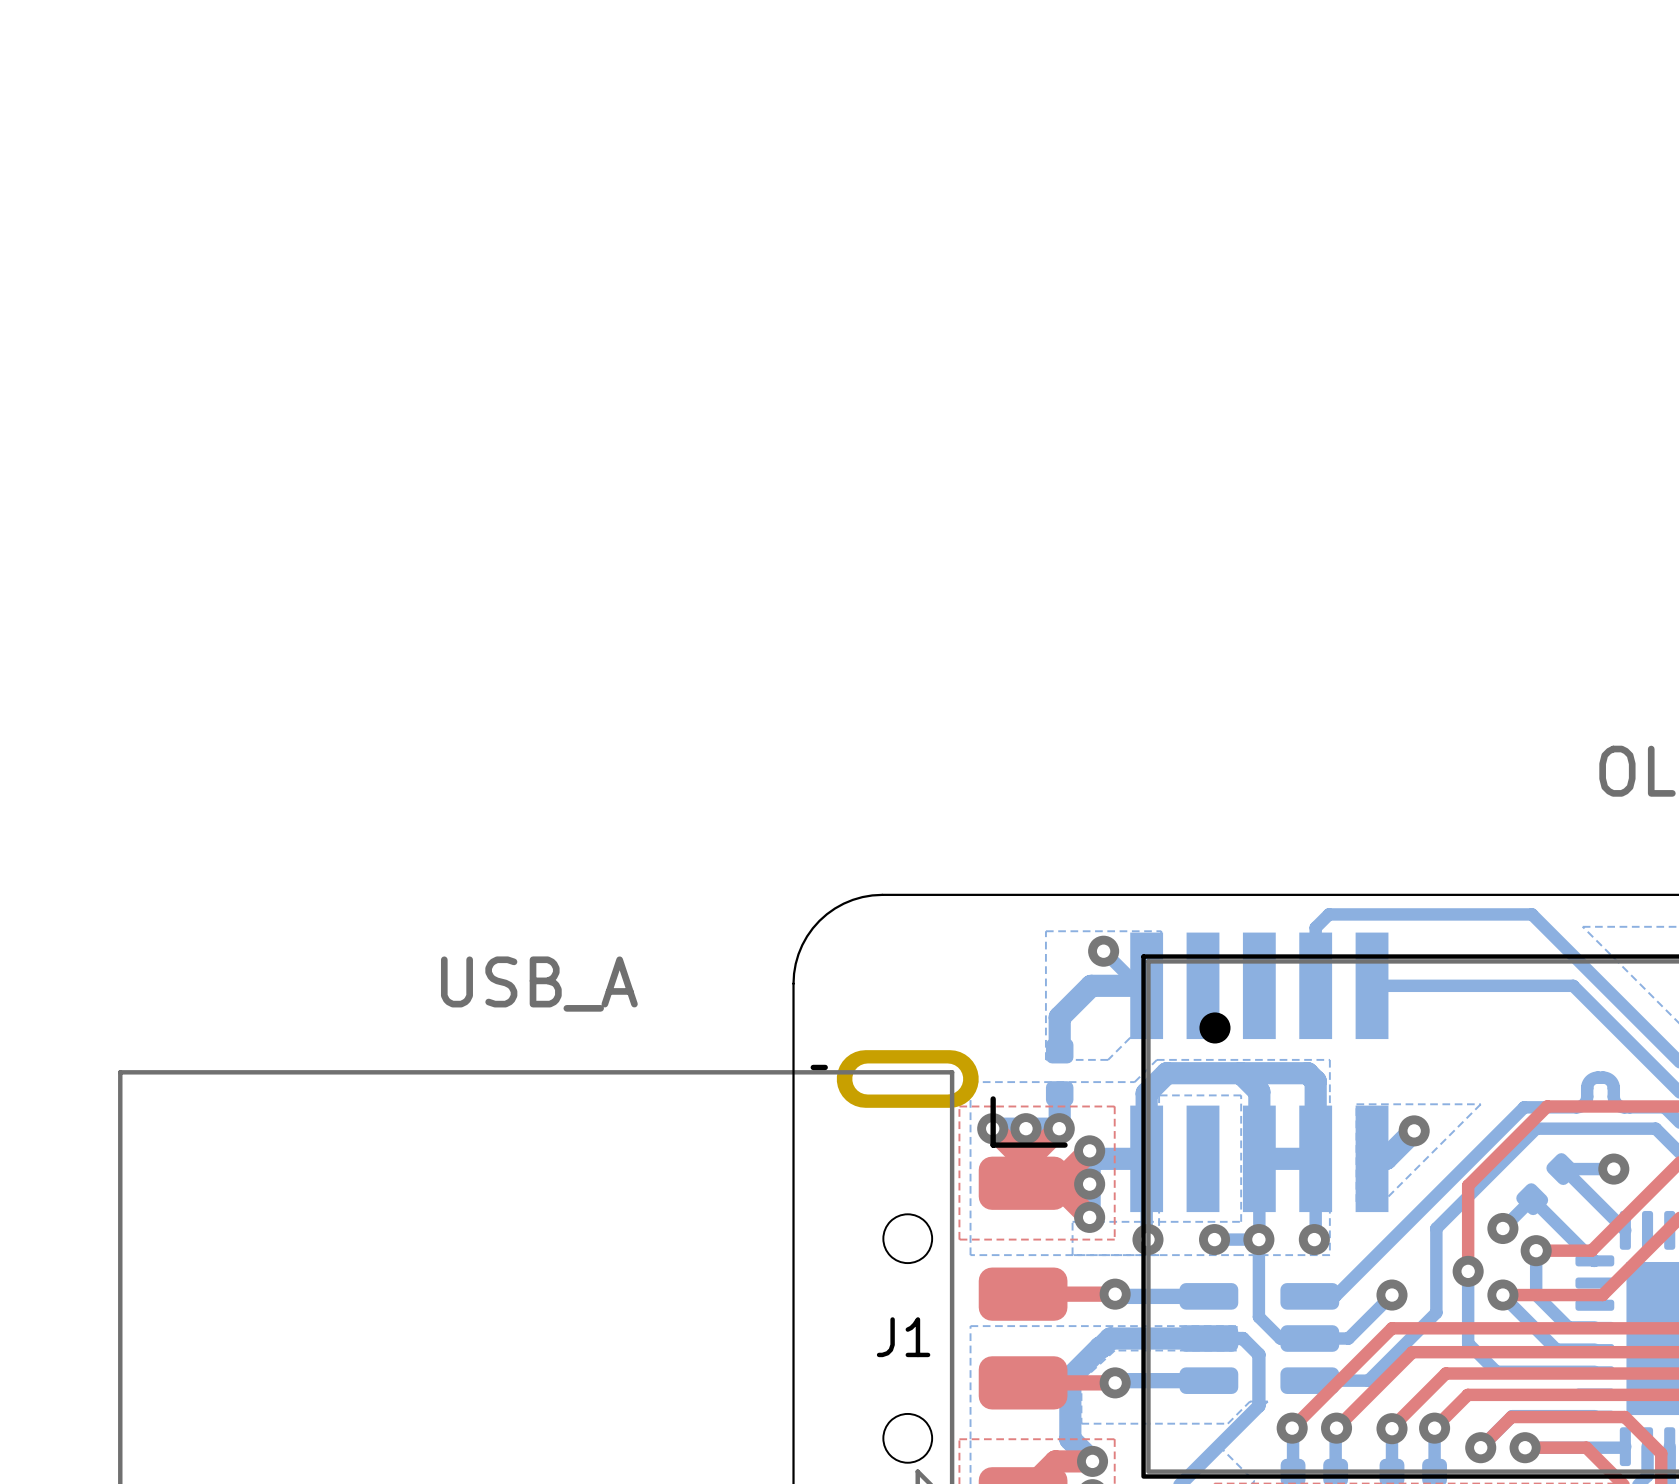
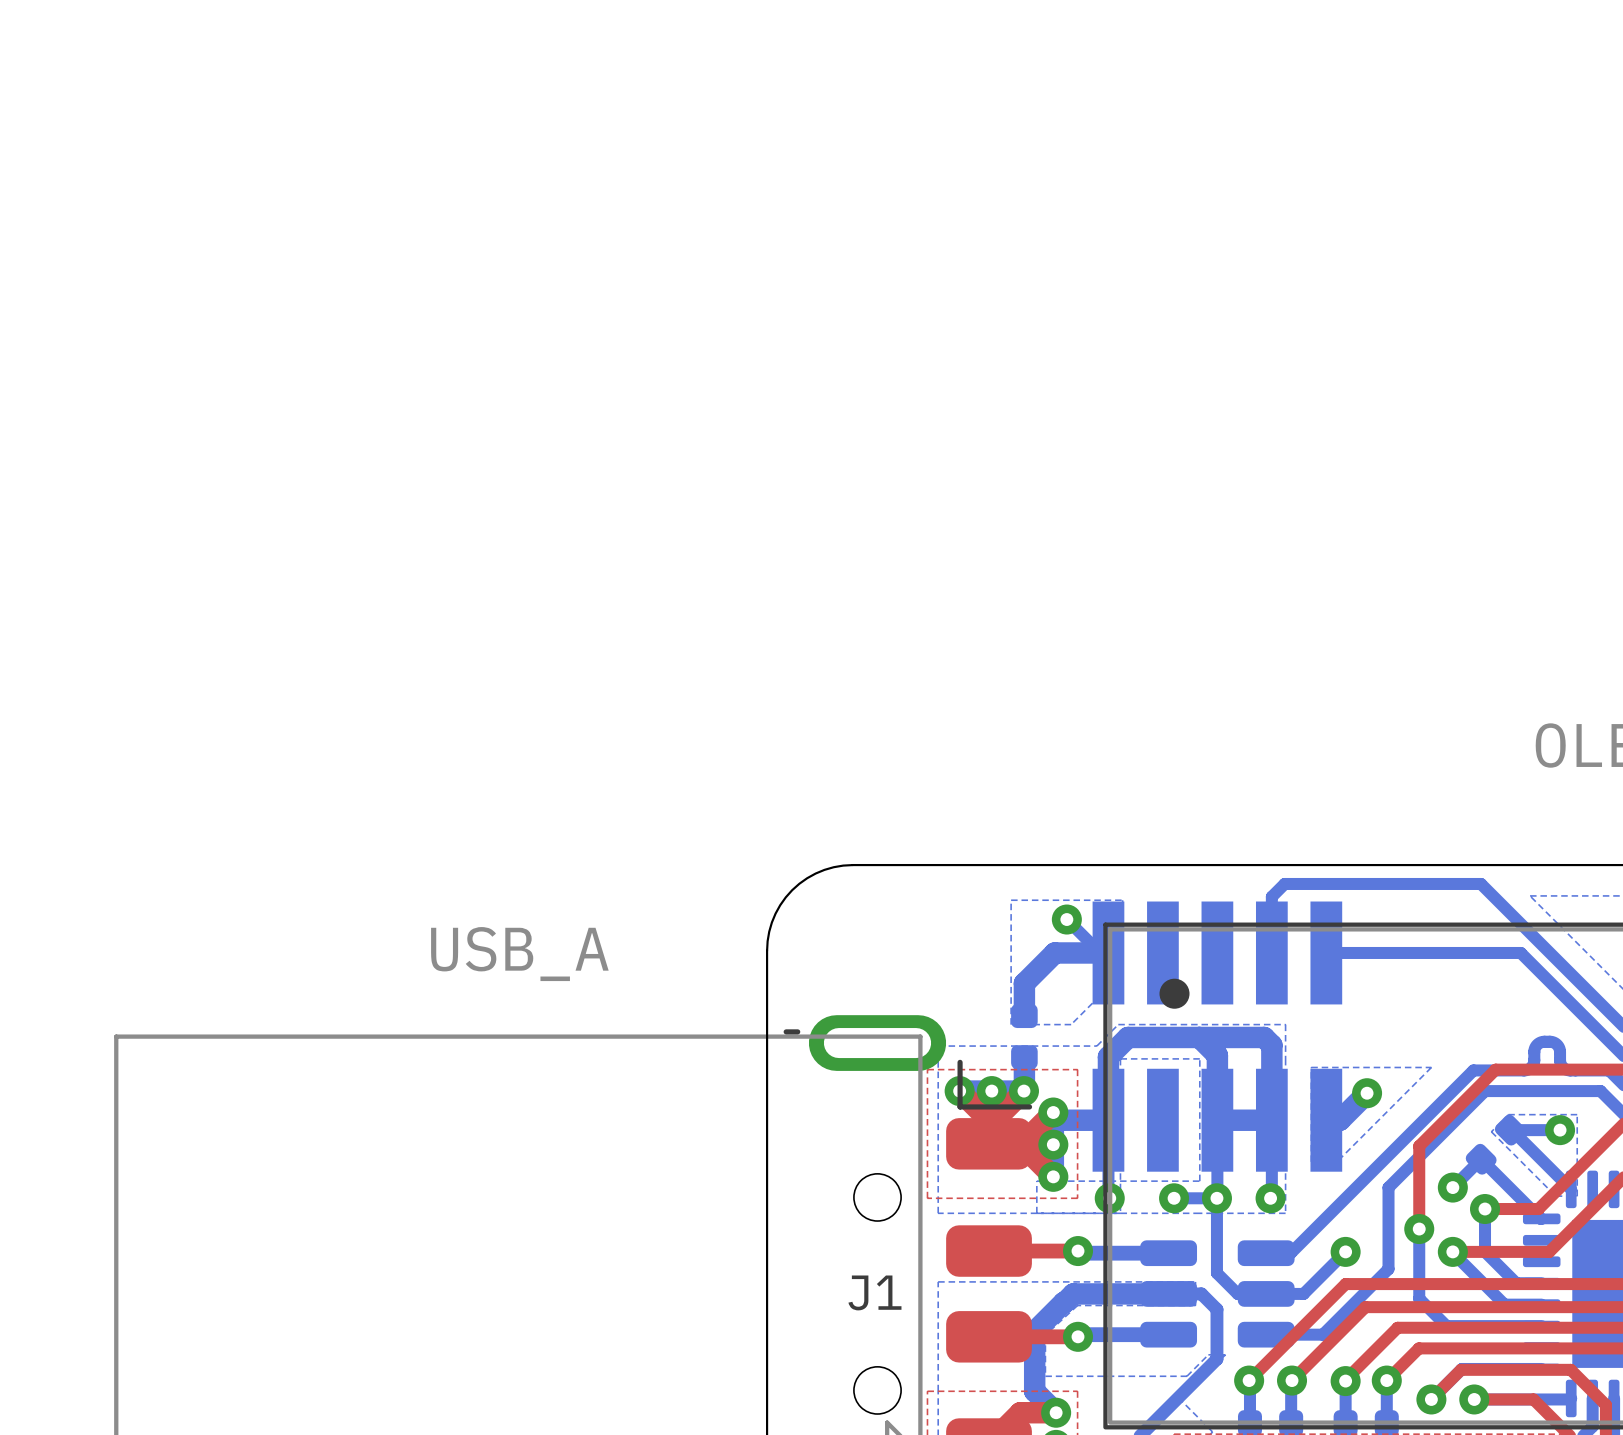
bottom zone outline: none -> (1508, 1114) (1577, 1114) (1577, 1196) (1555, 1196) (1491, 1131) (1508, 1114)

